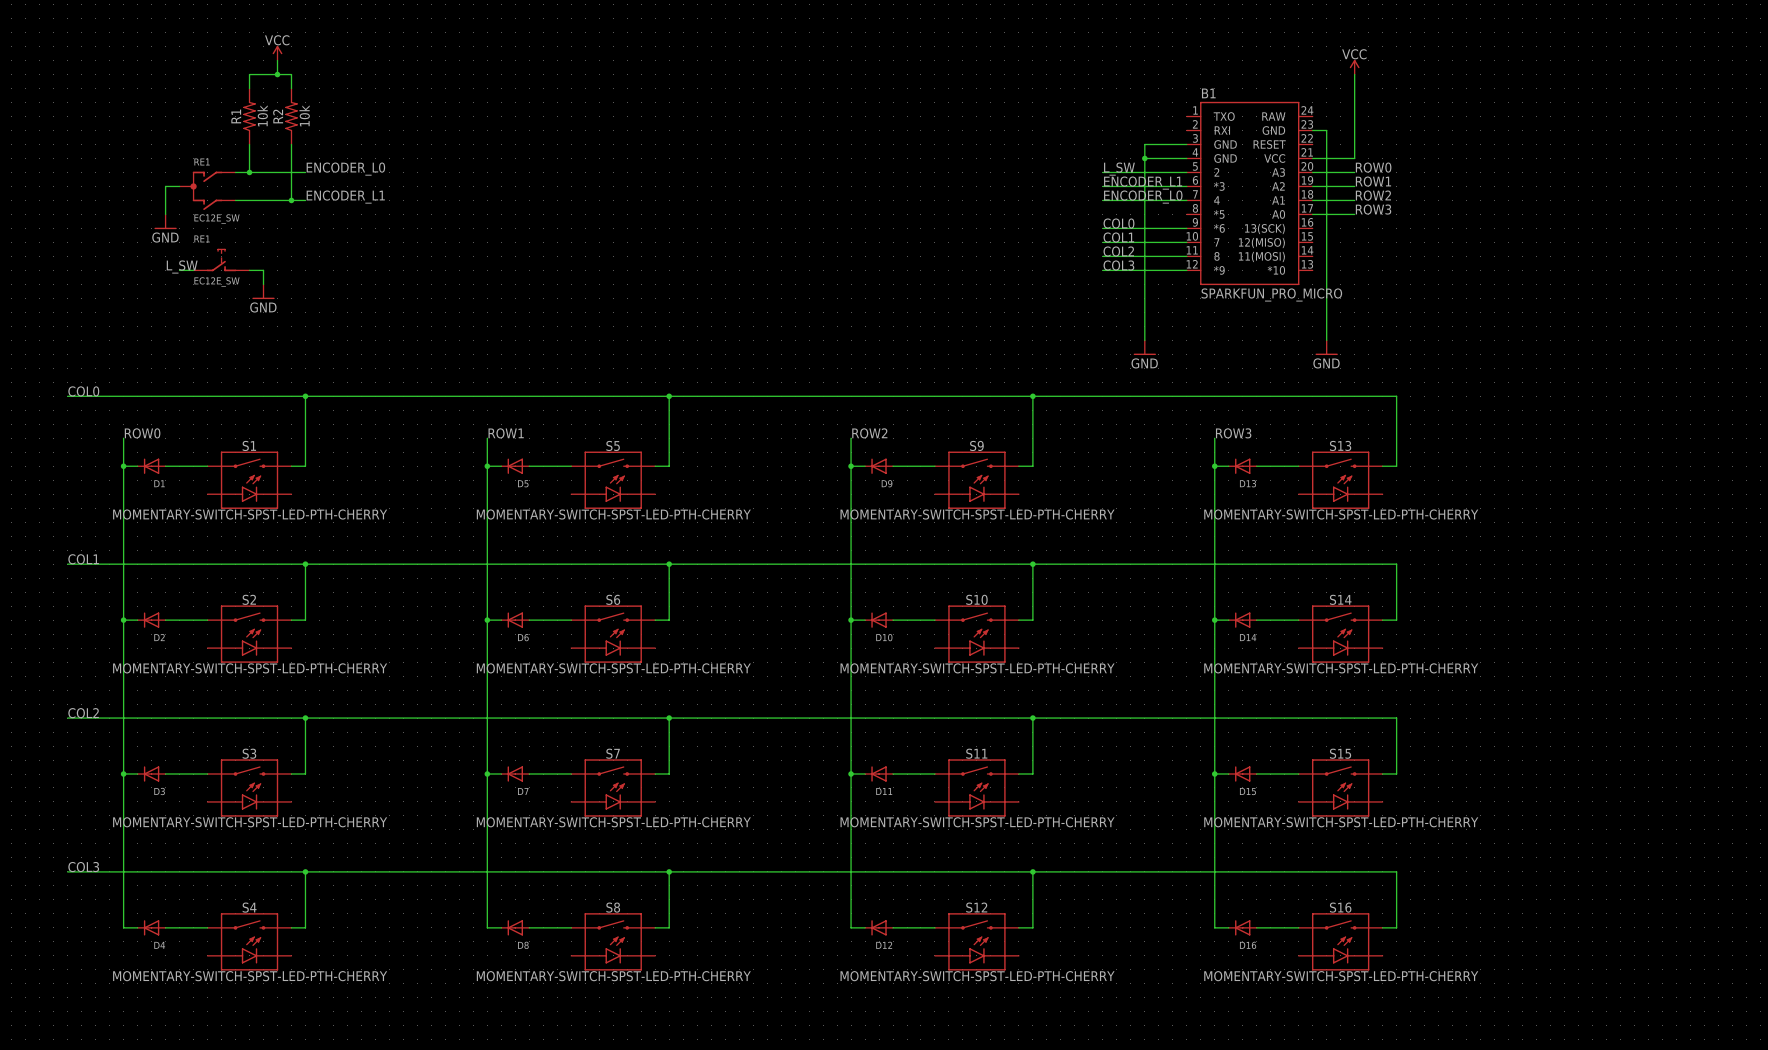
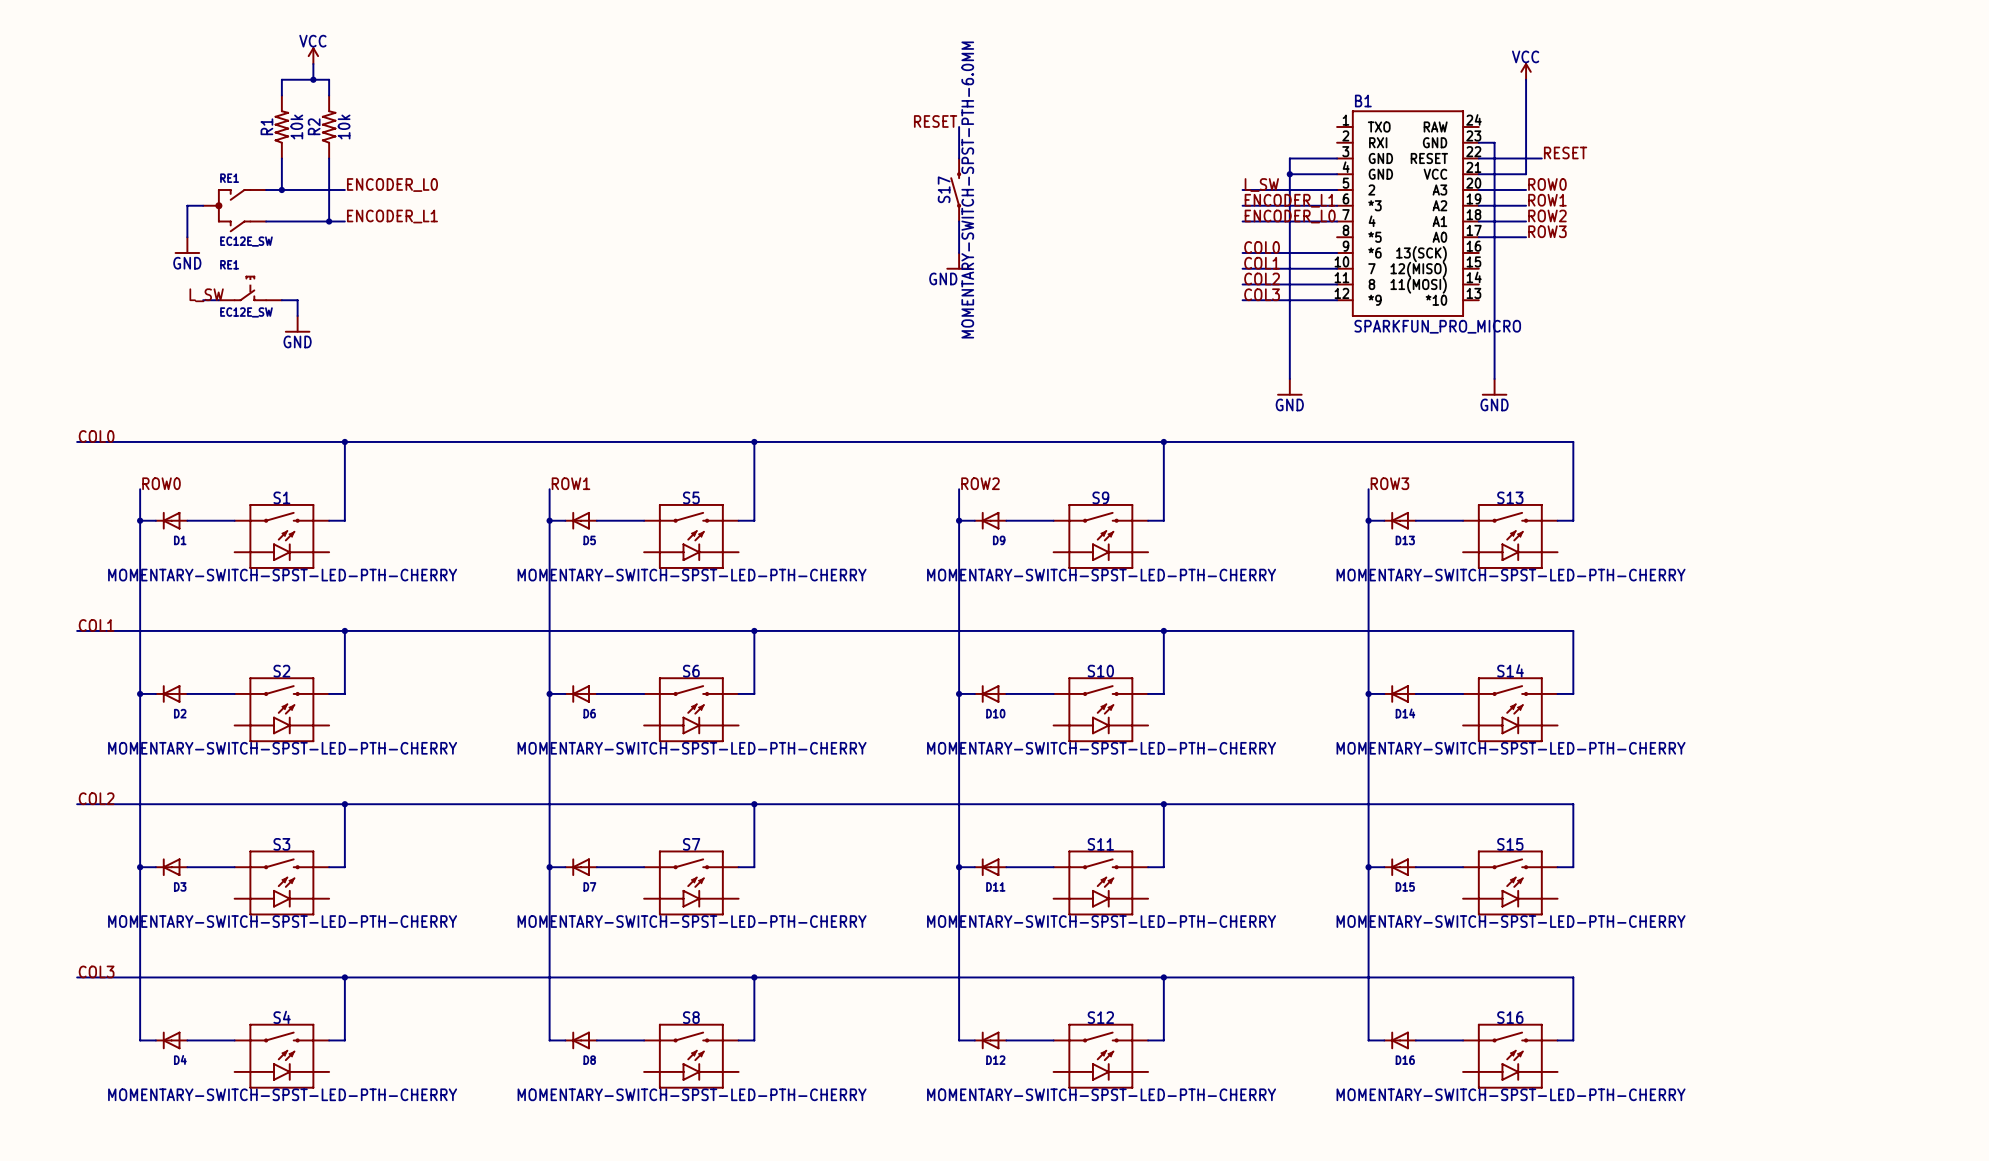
label: none -> RESET (935, 121)
wire: none -> (959, 126) (959, 158)
label: none -> RESET (1565, 152)
wire: none -> (1478, 158) (1541, 158)
S17: none -> MOMENTARY-SWITCH-SPST-PTH-6.0MM (955, 189)
wire: none -> (959, 221) (959, 252)
power symbol: none -> GND (959, 261)

